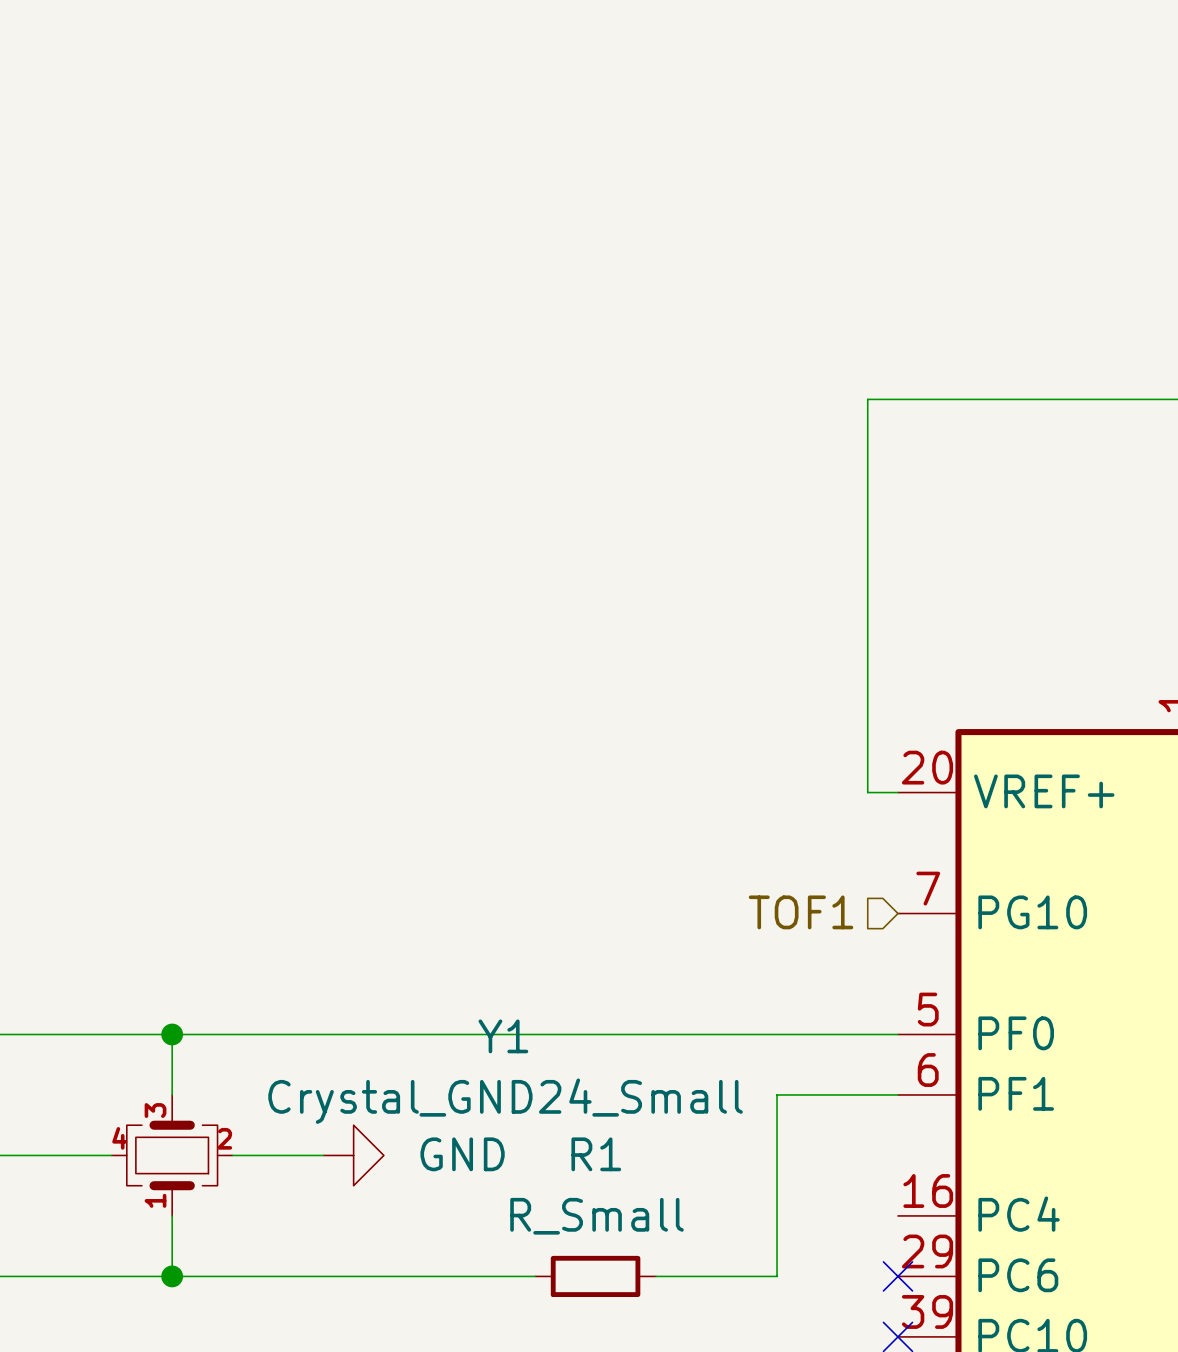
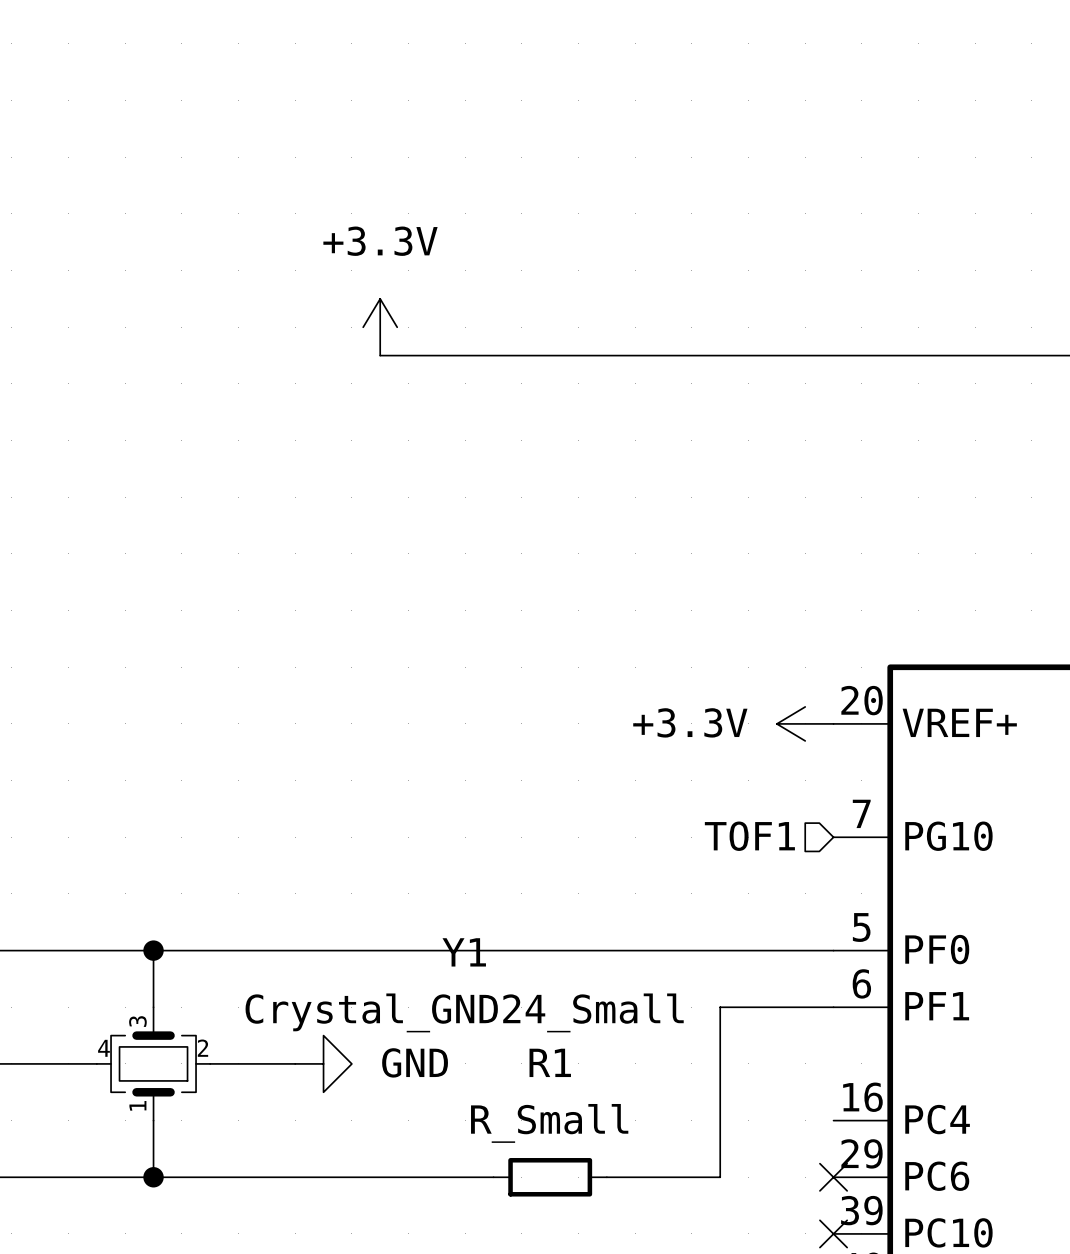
power symbol: none -> +3.3V (380, 327)
wire: (867, 399) (867, 792) (897, 792) -> (805, 355) (380, 355)
power symbol: none -> +3.3V (805, 723)

